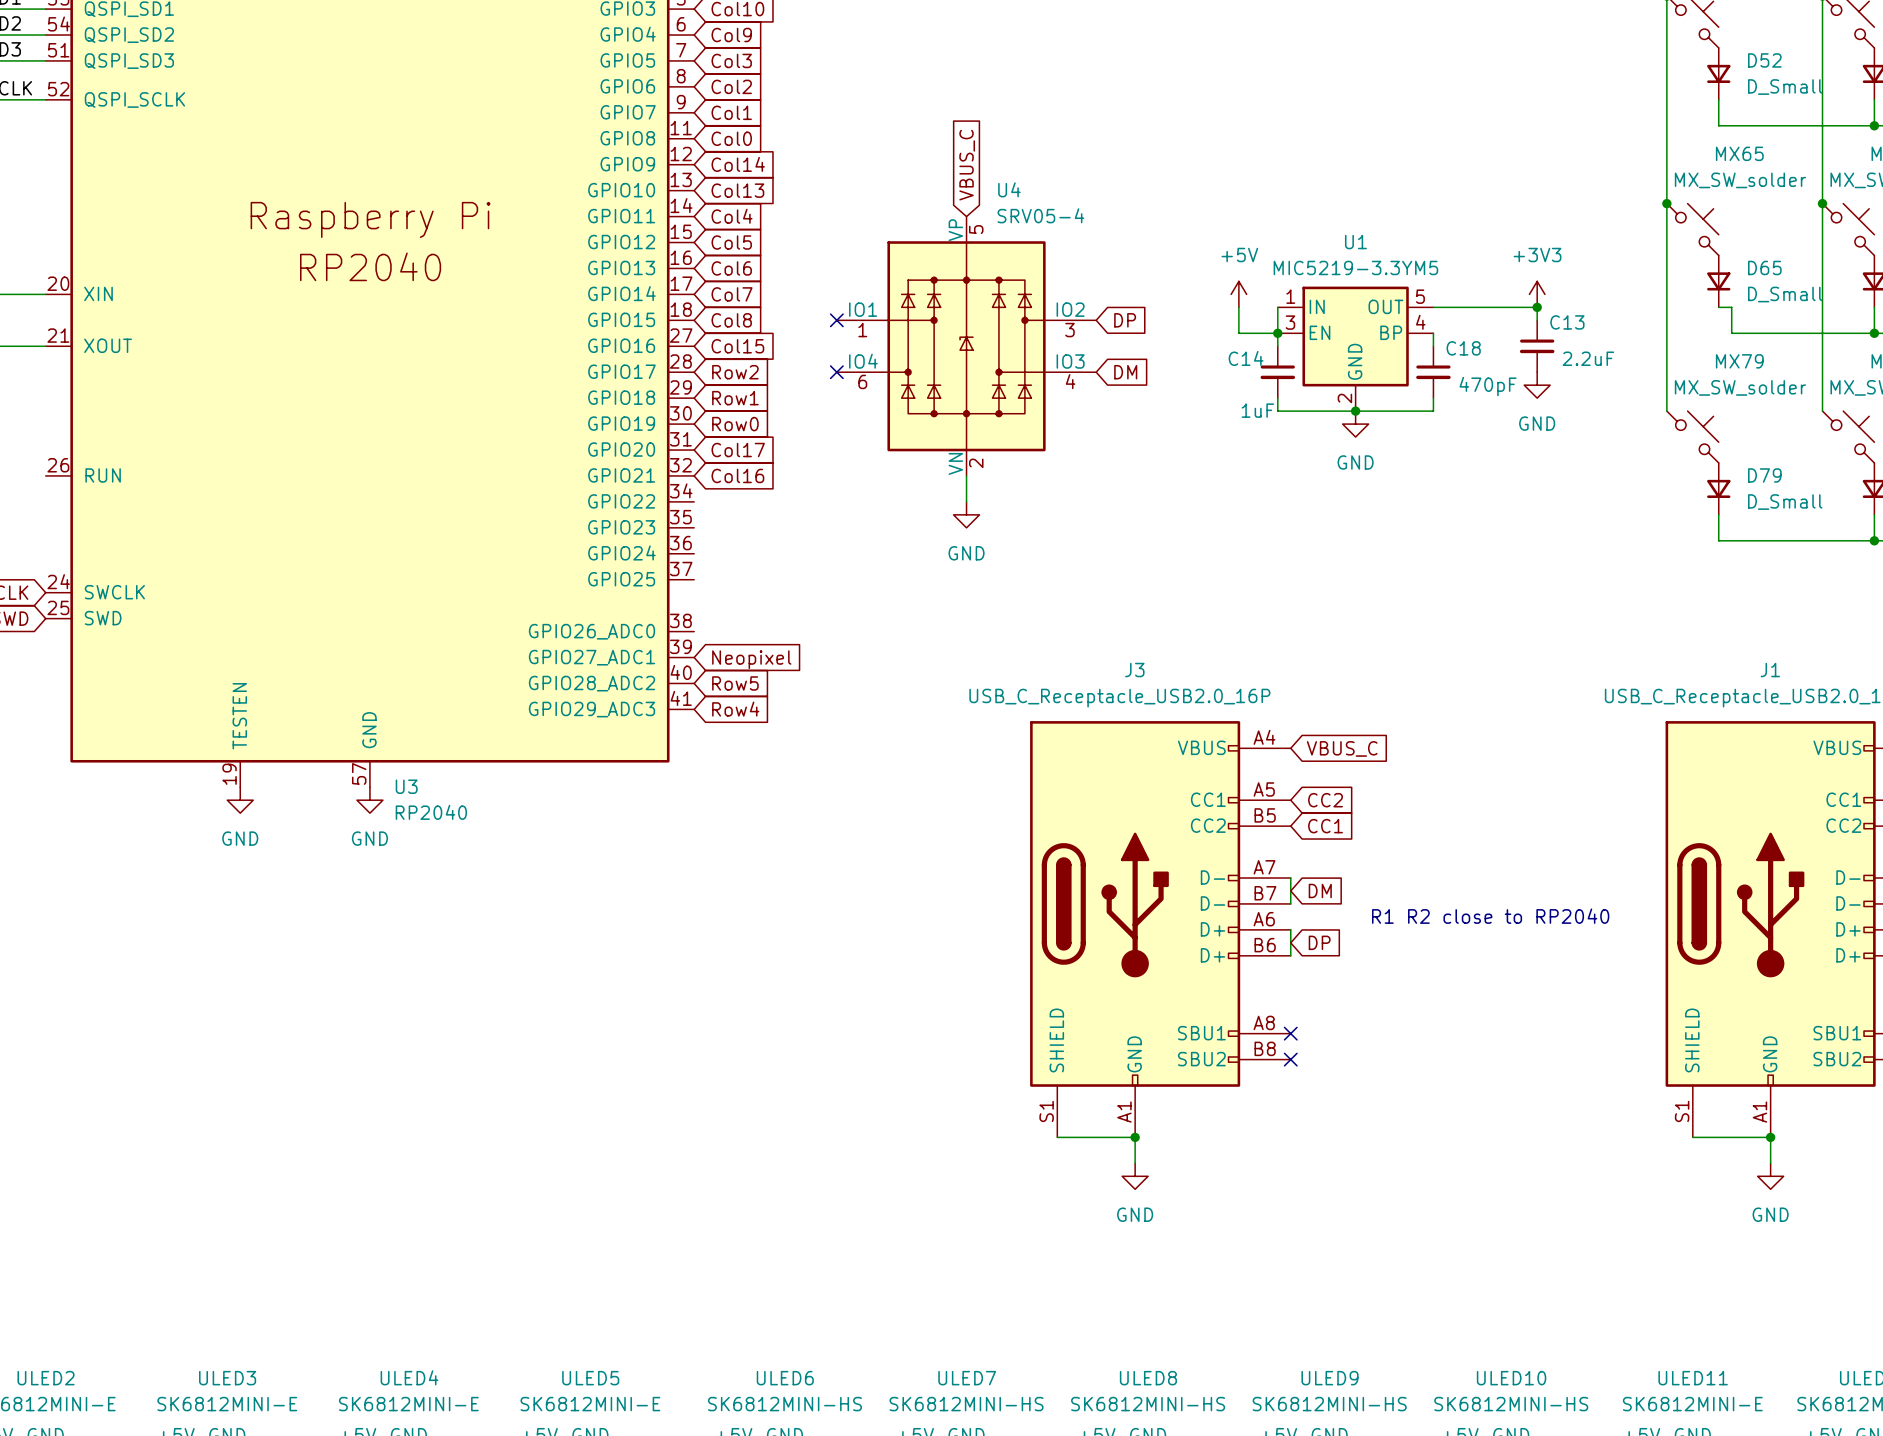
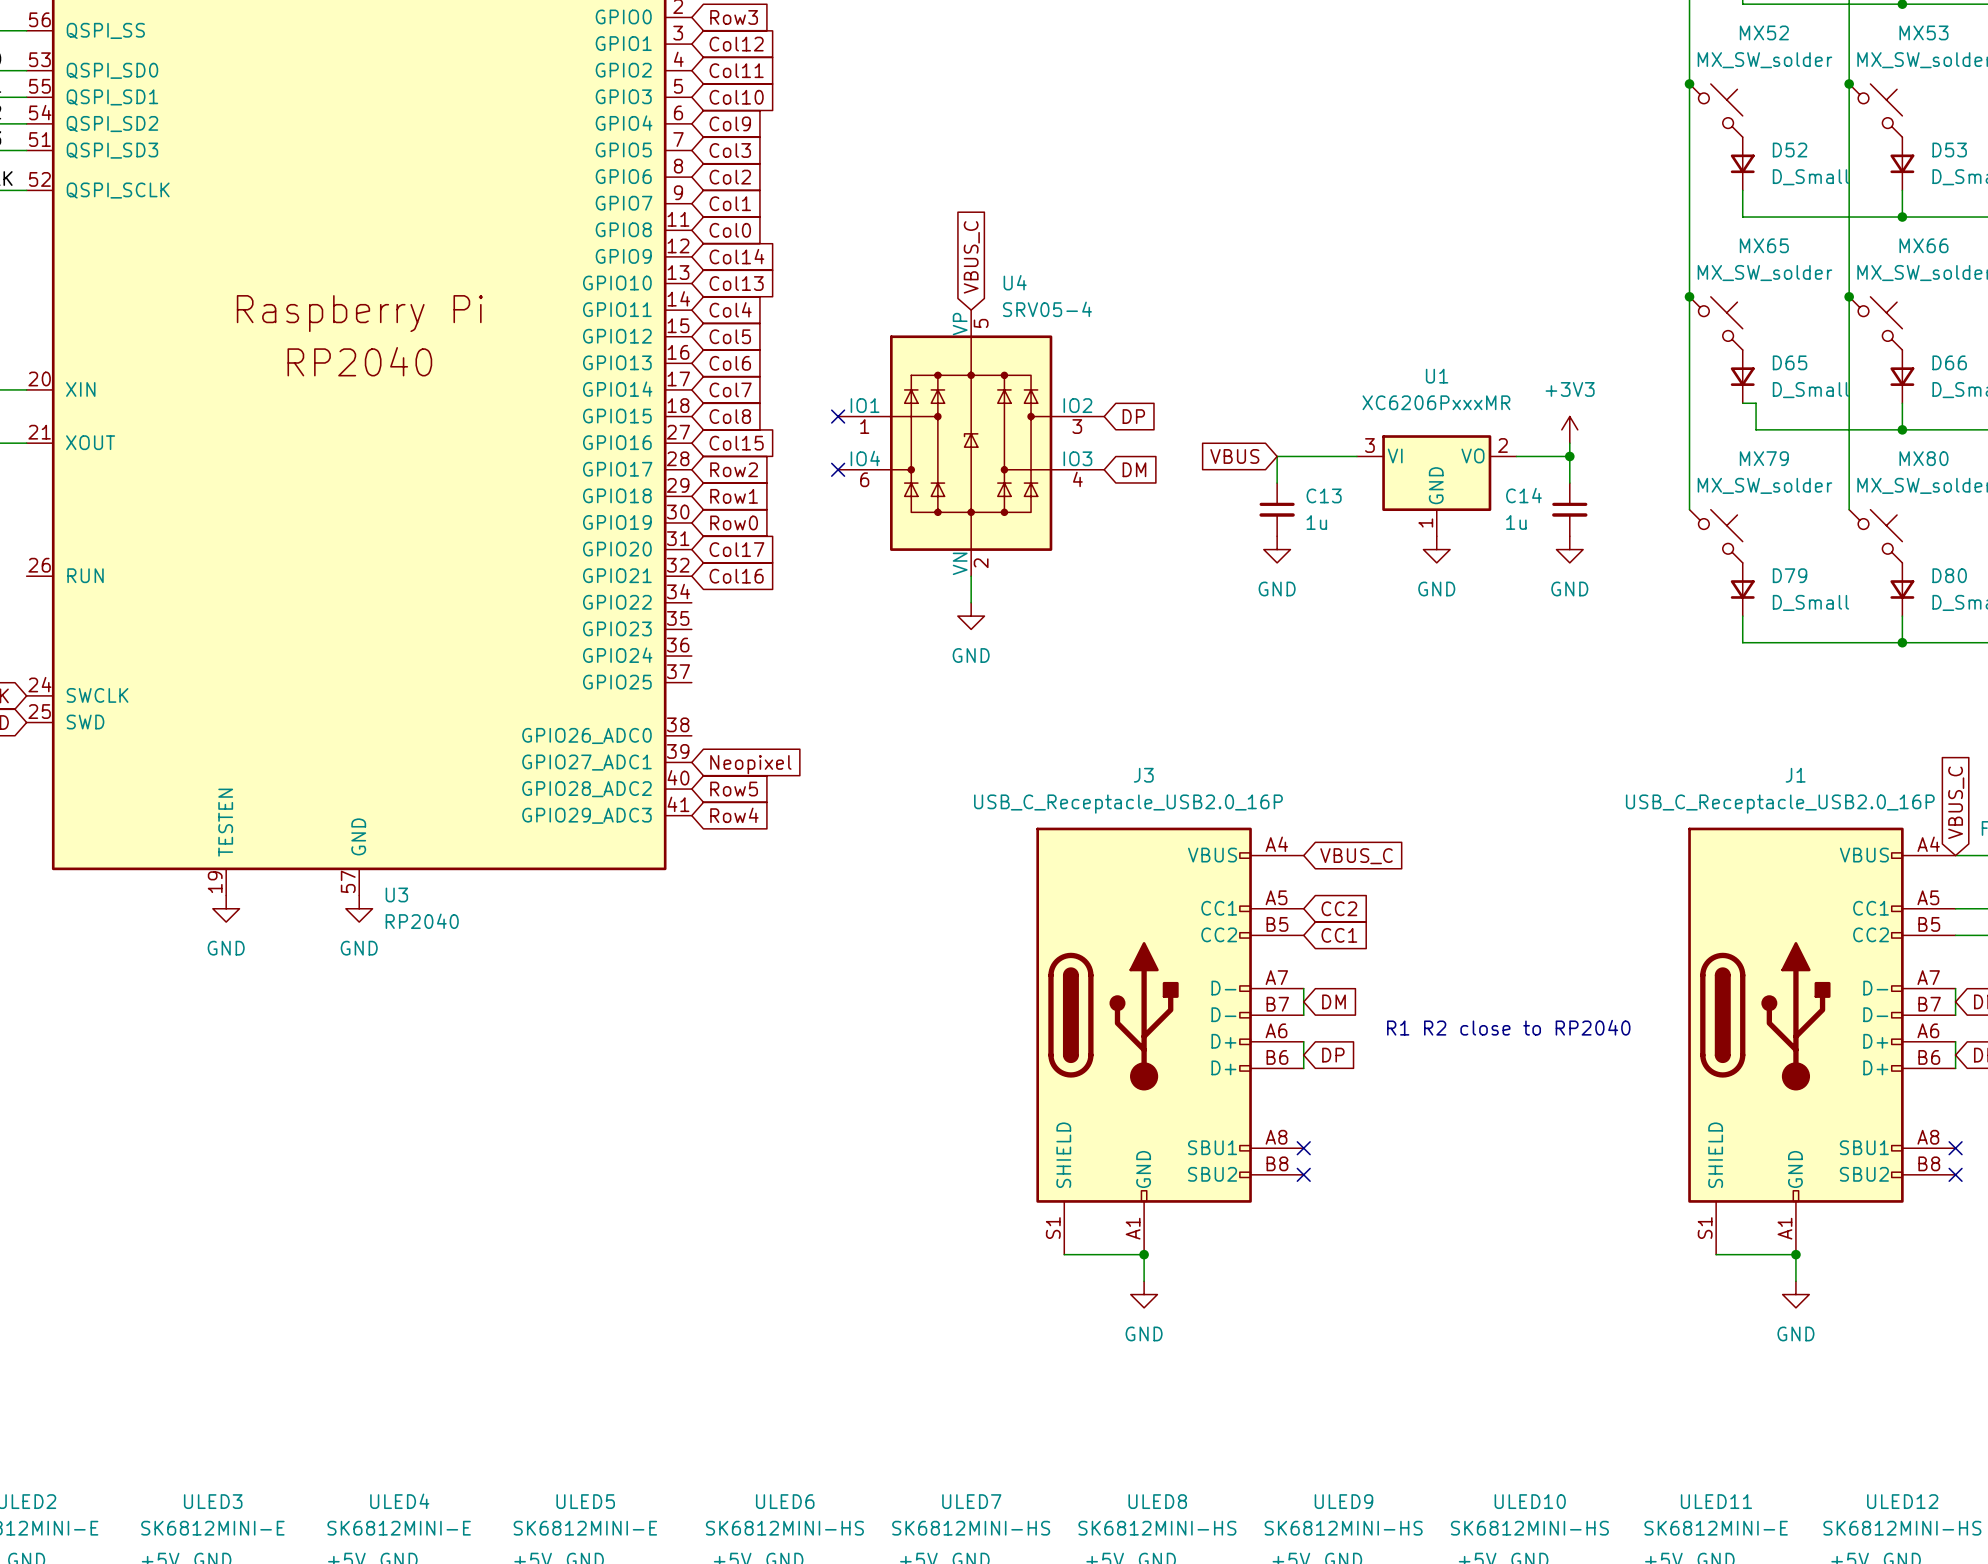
U1 value: MIC5219-3.3YM5 (1355, 267) -> XC6206PxxxMR (1436, 402)
U1 symbol: [1277, 286, 1434, 412] -> [1356, 435, 1517, 537]
power symbol: +5V (1238, 294) -> none
power symbol position: +3V3 (1537, 294) -> +3V3 (1569, 429)
wire: (1238, 307) (1238, 333) (1277, 333) -> none
wire: (1277, 307) (1277, 346) -> none
wire: (1433, 307) (1537, 307) (1537, 320) -> none
junction position: (1537, 307) -> (1569, 456)
C13 name position: C13 (1567, 322) -> C13 (1324, 495)
junction: (1277, 333) -> none
C13 position: (1537, 346) -> (1277, 509)
wire: none -> (1569, 443) (1569, 483)
C14 name position: C14 (1246, 358) -> C14 (1523, 495)
C13 value: 2.2uF (1588, 358) -> 1u (1316, 522)
global label: none -> VBUS (1234, 456)
wire: none -> (1356, 456) (1277, 456) (1277, 483)
wire: none -> (1516, 456) (1569, 456)
C14 position: (1277, 372) -> (1569, 509)
C18: 470pF (1433, 372) -> none
power symbol position: GND (1537, 385) -> GND (1569, 549)
wire: (1277, 398) (1277, 411) (1433, 411) (1433, 398) -> none
C14 value: 1uF (1257, 410) -> 1u (1516, 522)
junction: (1355, 411) -> none
power symbol: GND (1355, 424) -> none
power symbol: none -> GND (1277, 549)
power symbol: none -> GND (1436, 549)

